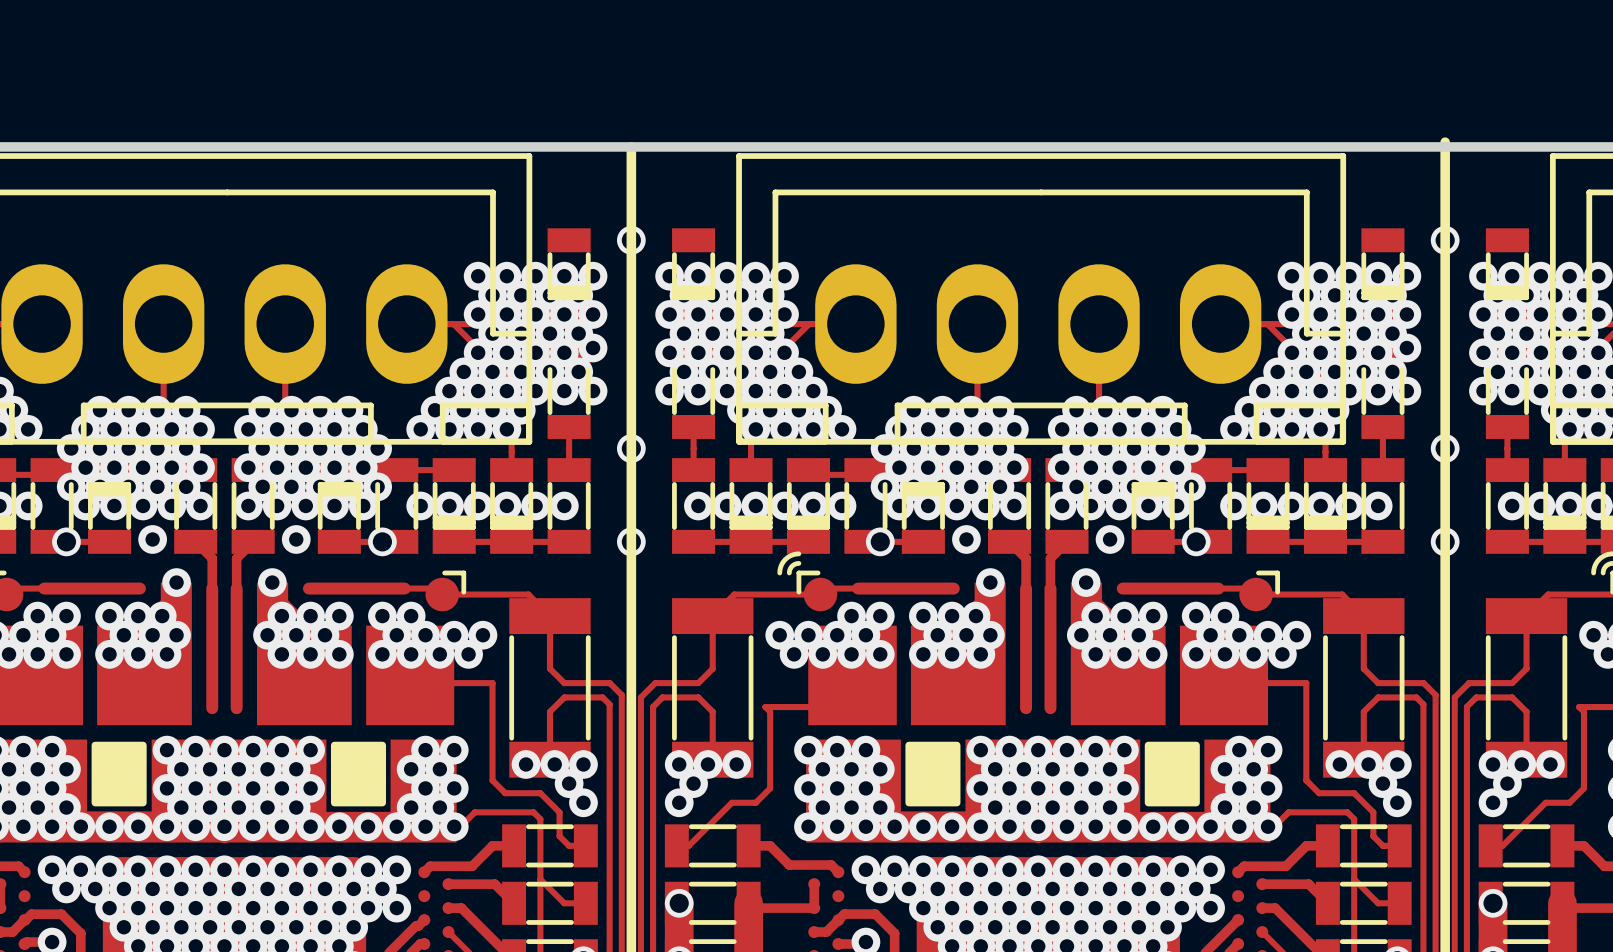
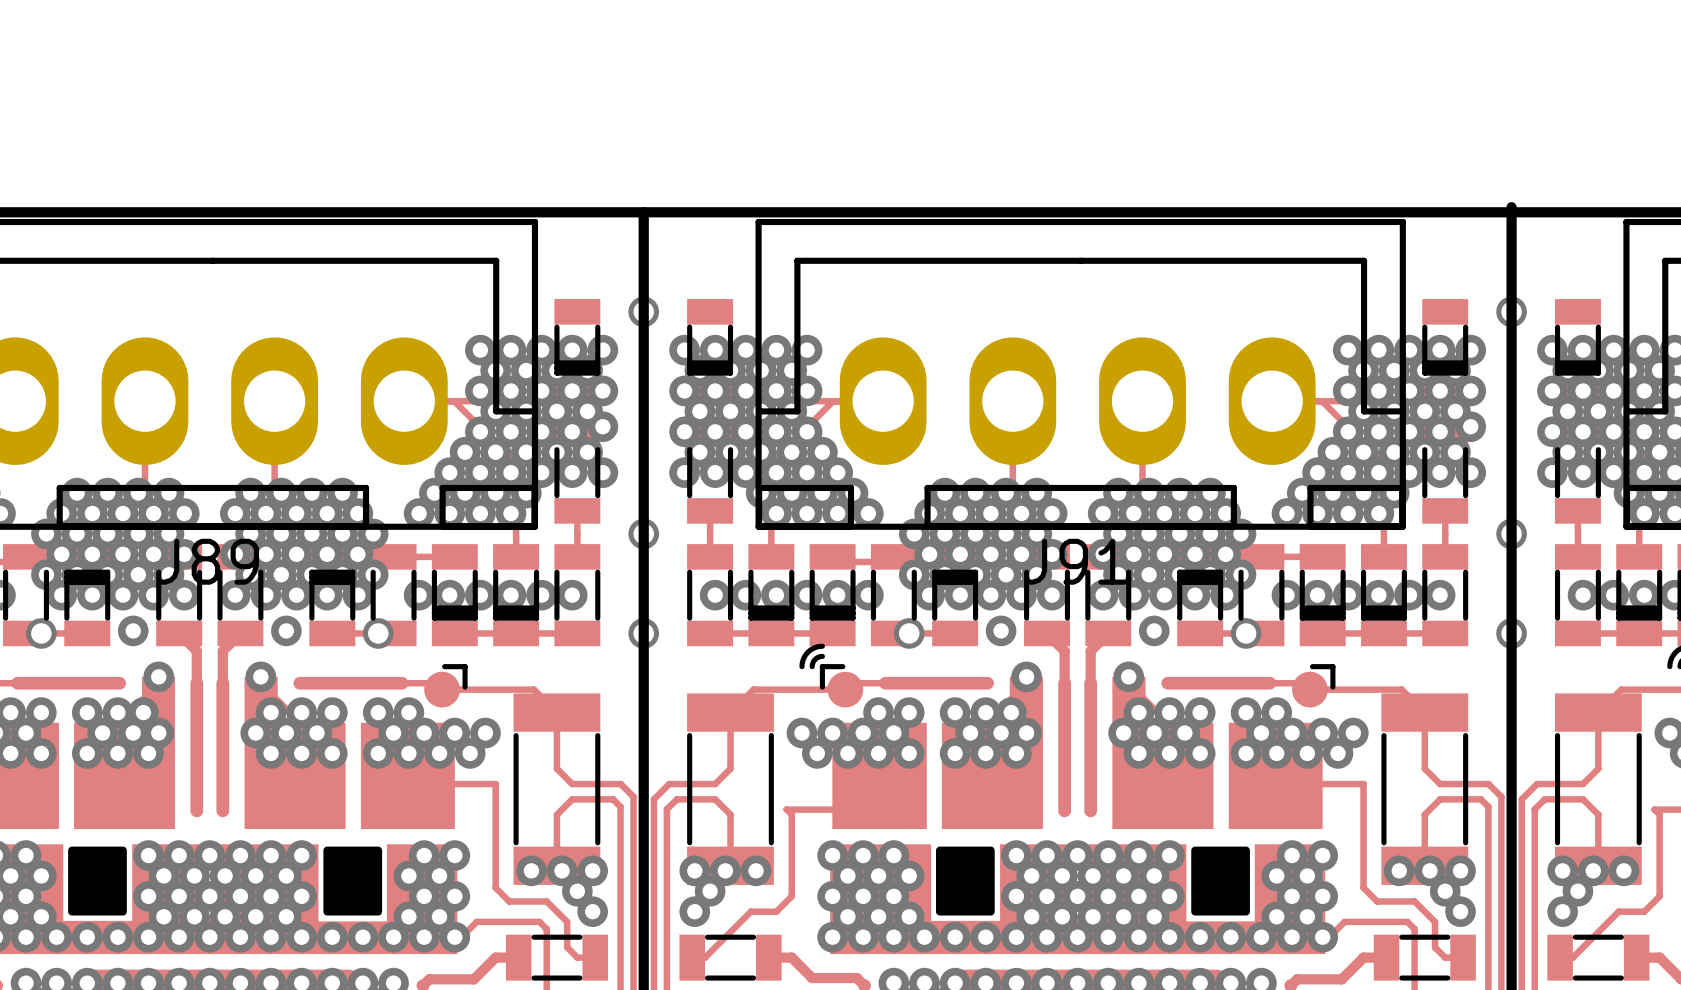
J89 name: none -> J89 (208, 561)
J91 name: none -> J91 (1076, 561)

